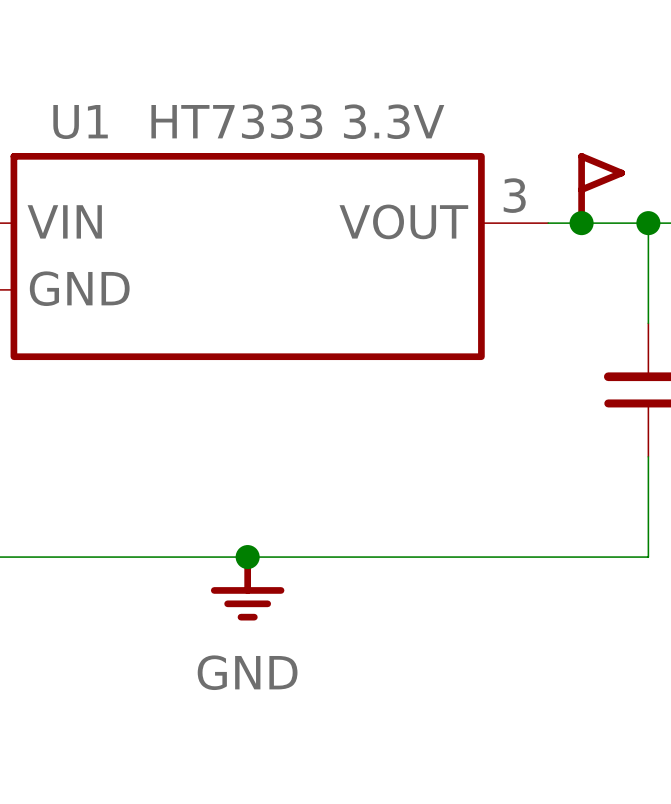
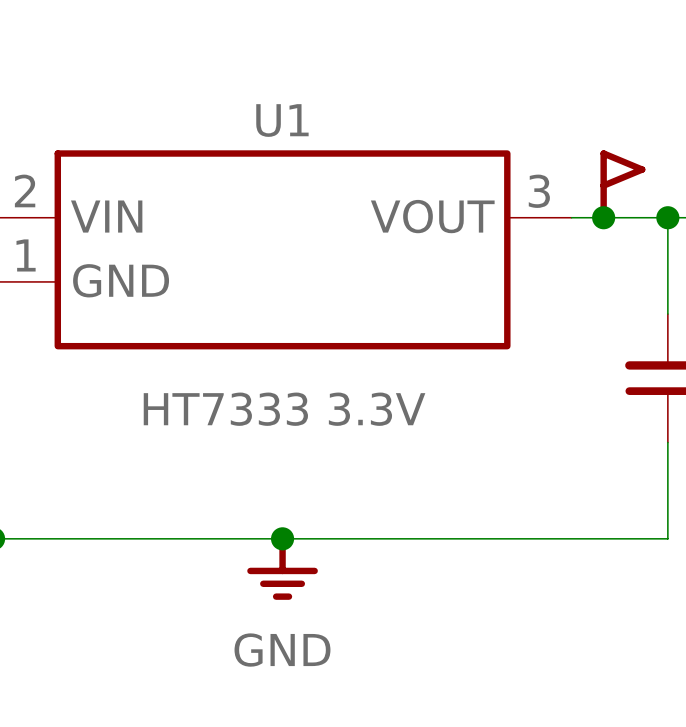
U1 value position: HT7333 3.3V (297, 121) -> HT7333 3.3V (284, 409)
U1 name position: U1 (80, 122) -> U1 (282, 120)

